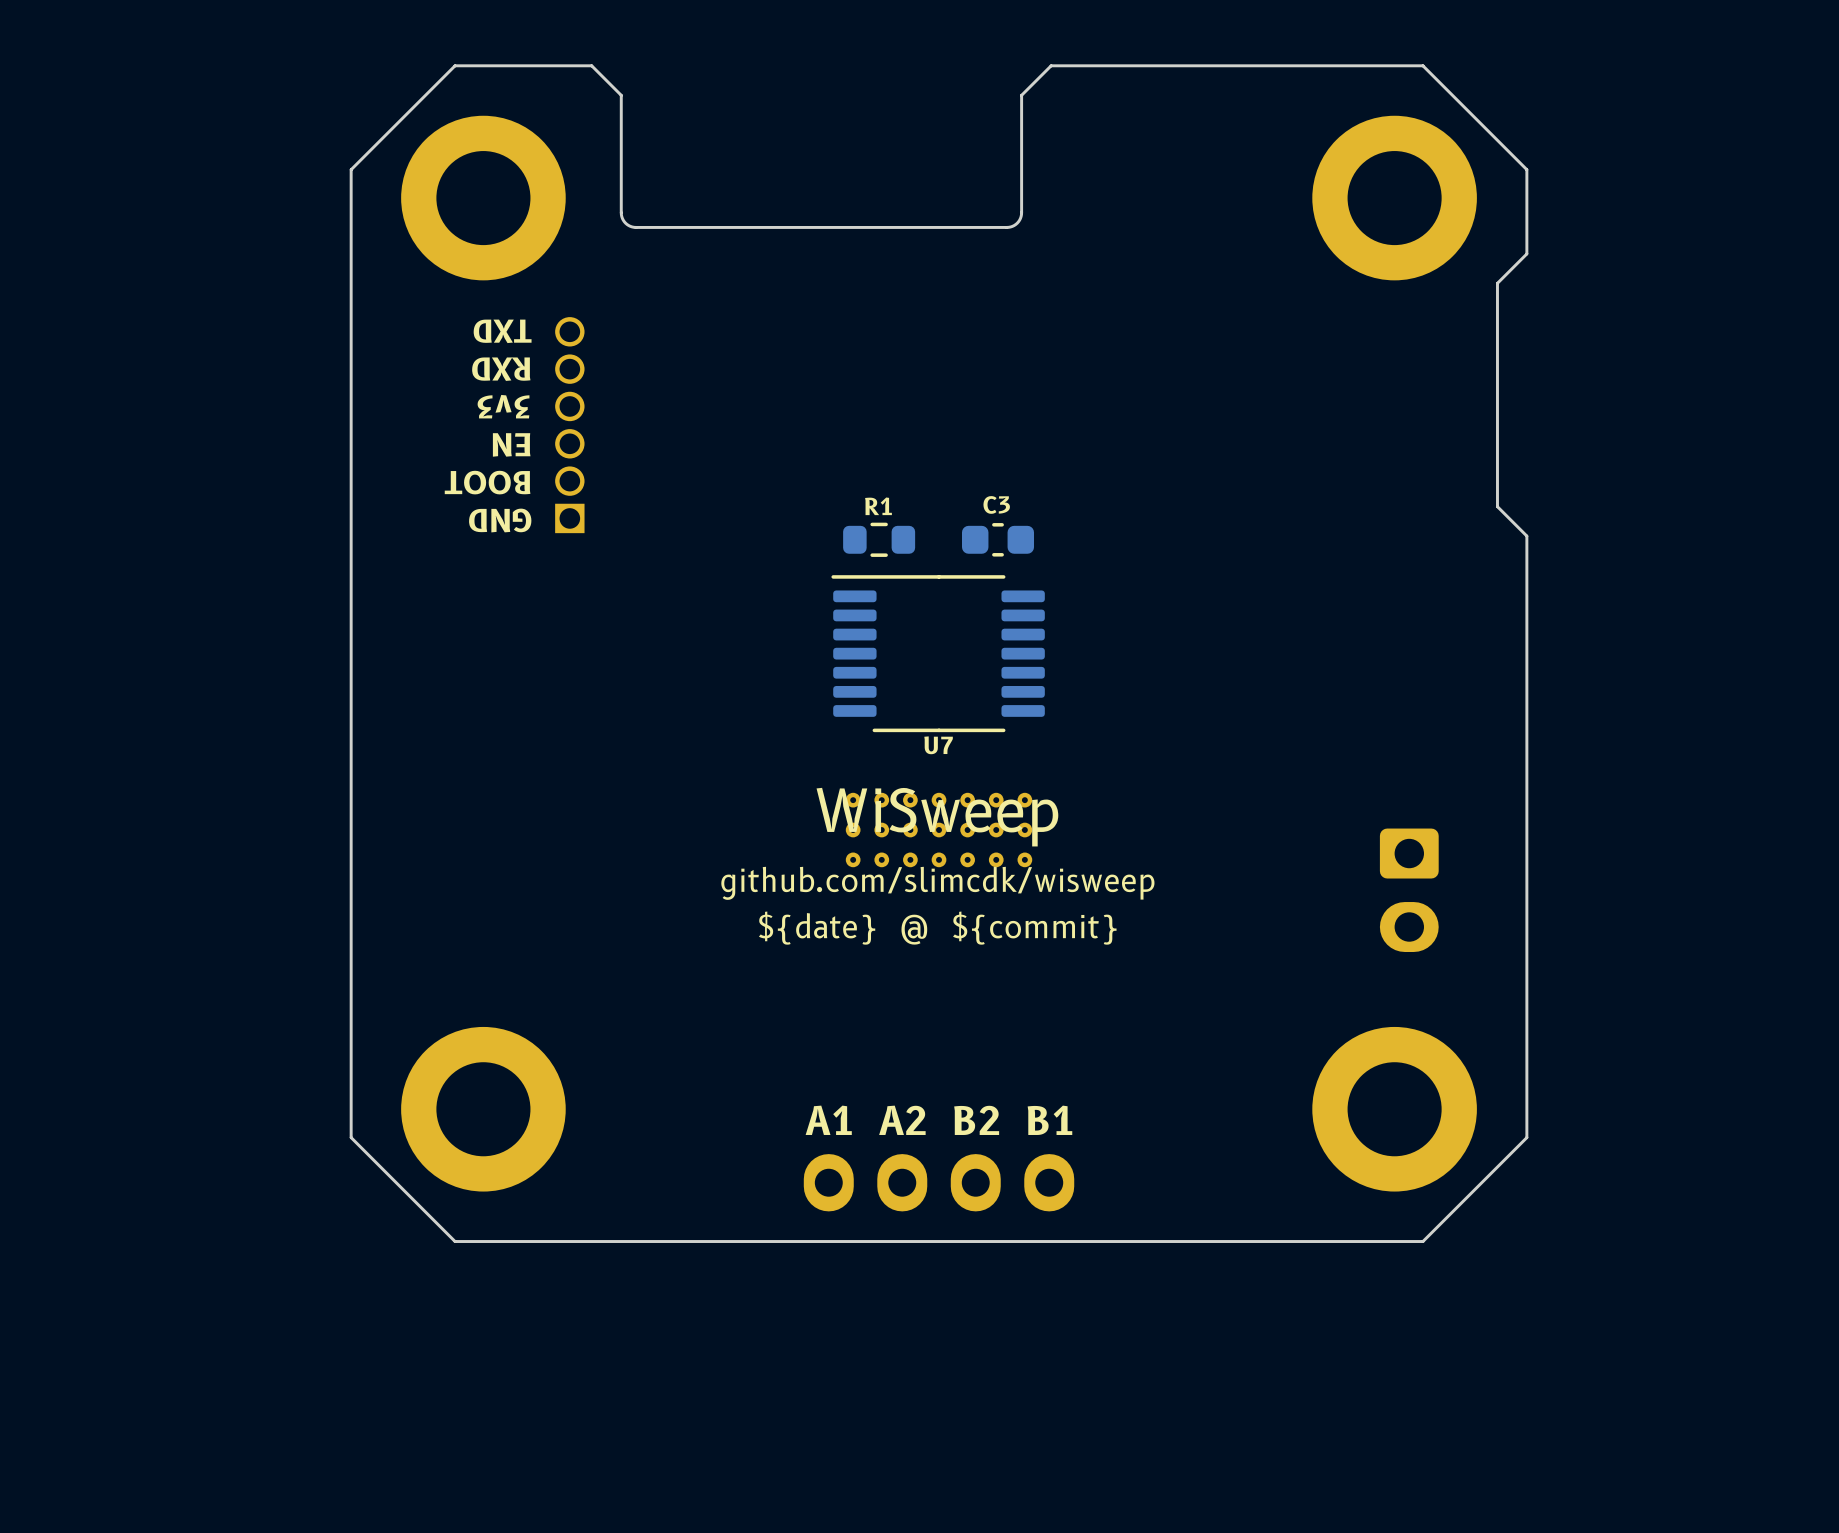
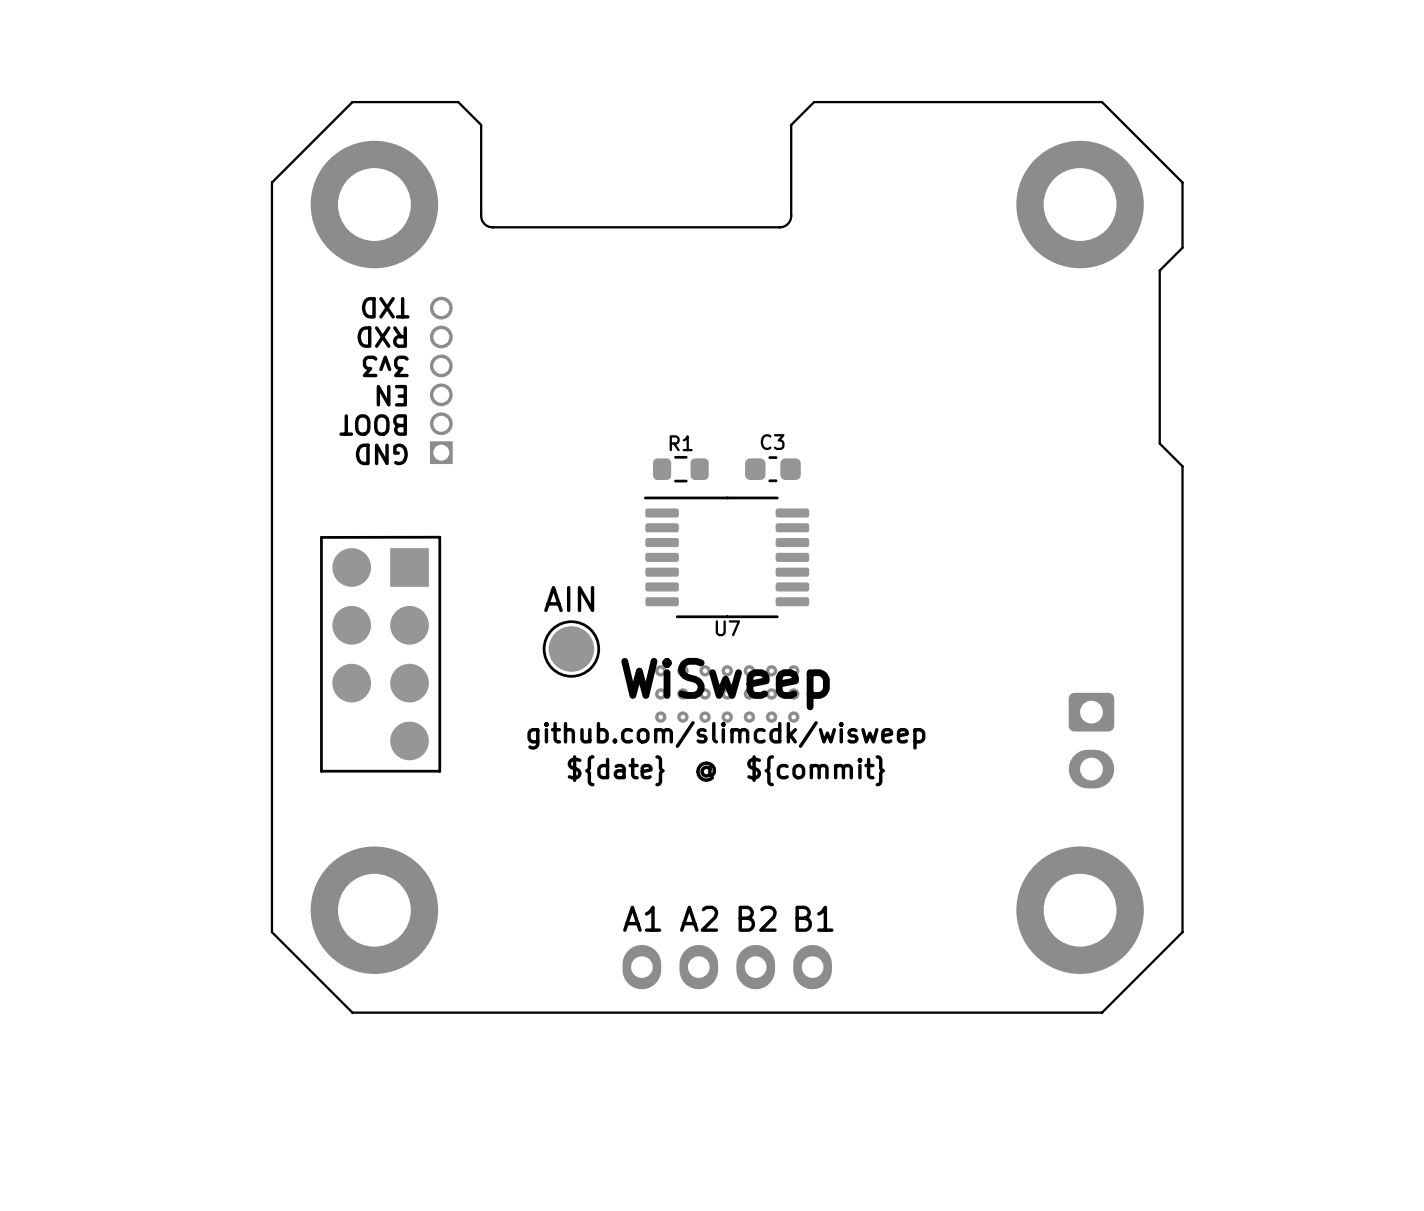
text: none -> AIN (569, 599)
part: none -> (571, 649)
part: none -> (380, 654)

